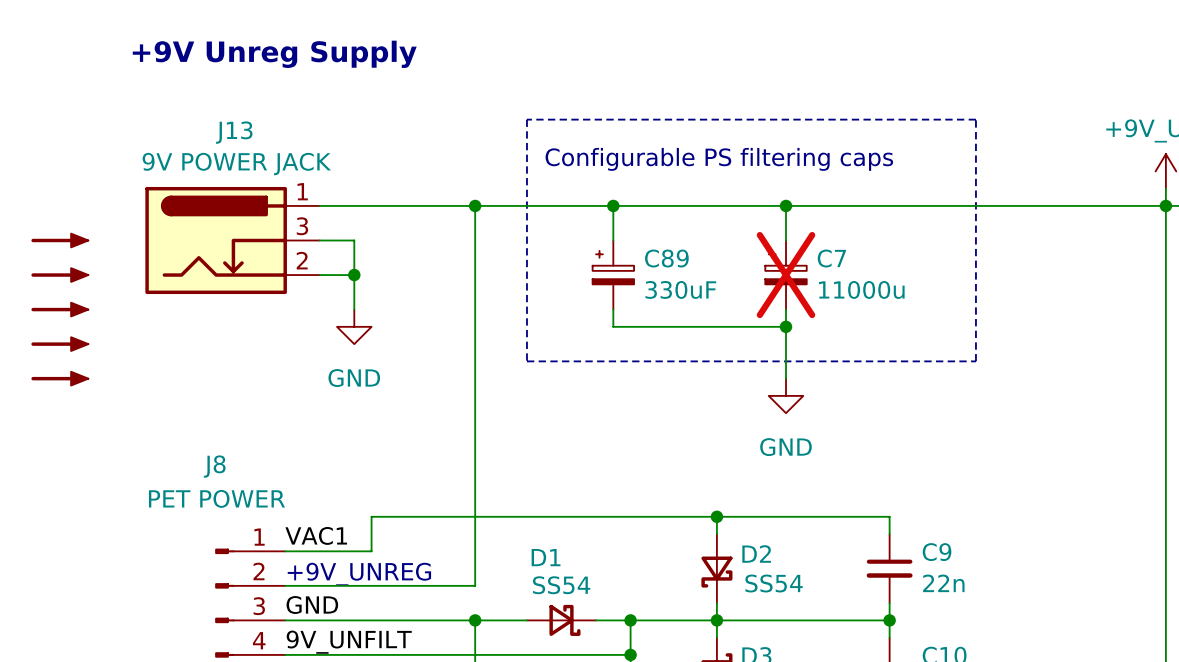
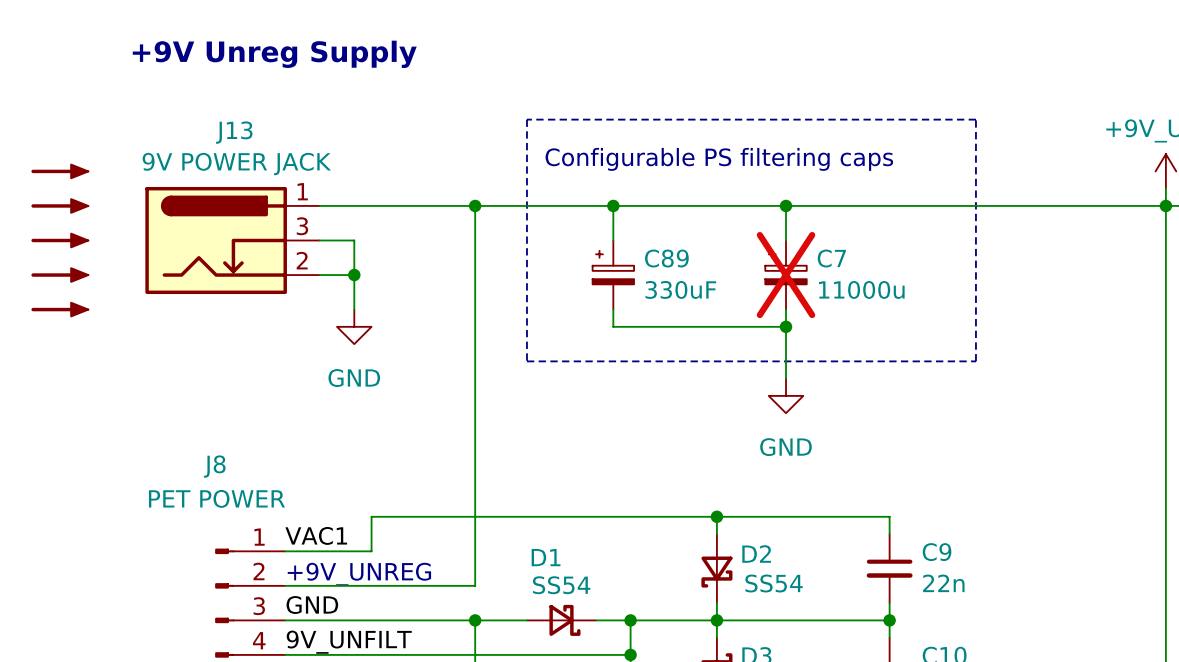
part: none -> (59, 171)
part: none -> (59, 205)
part: (59, 344) -> none
part: (59, 378) -> none

